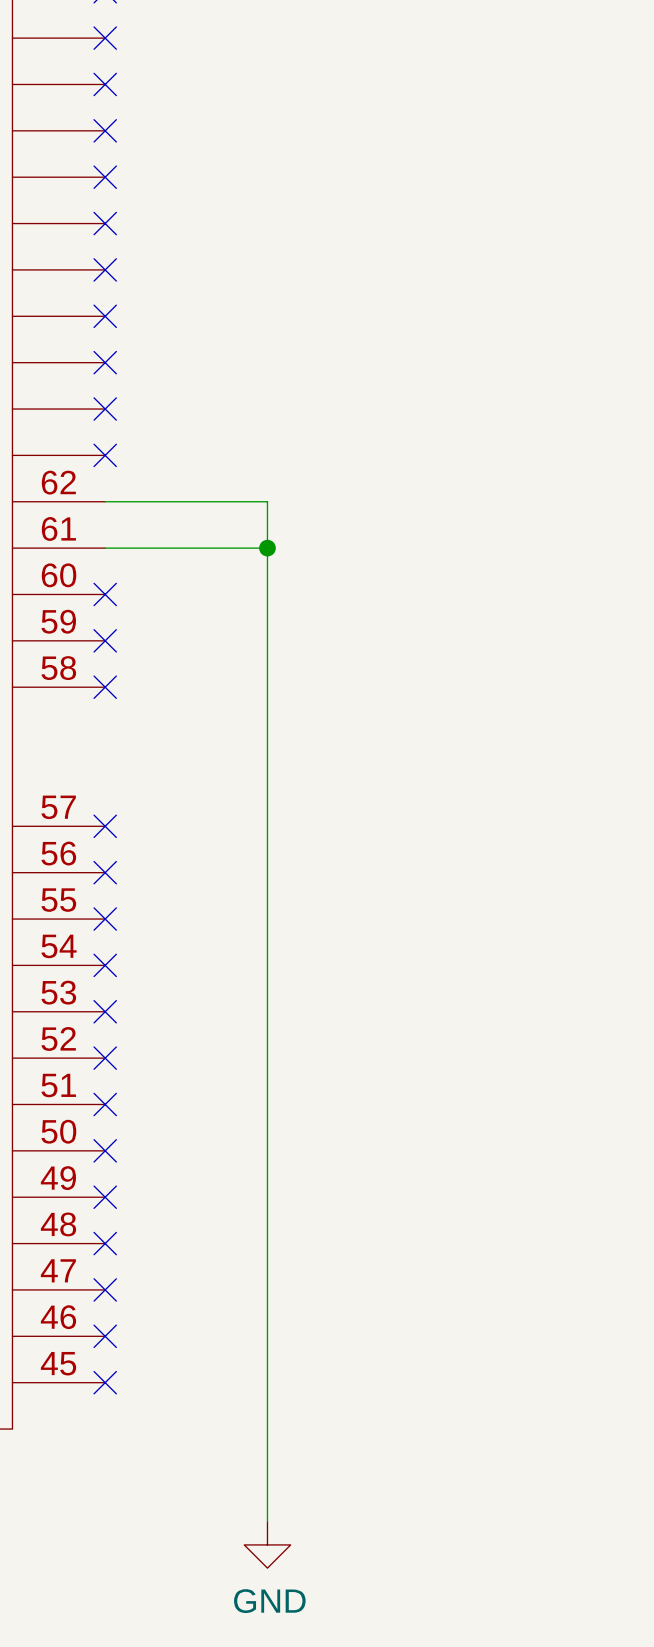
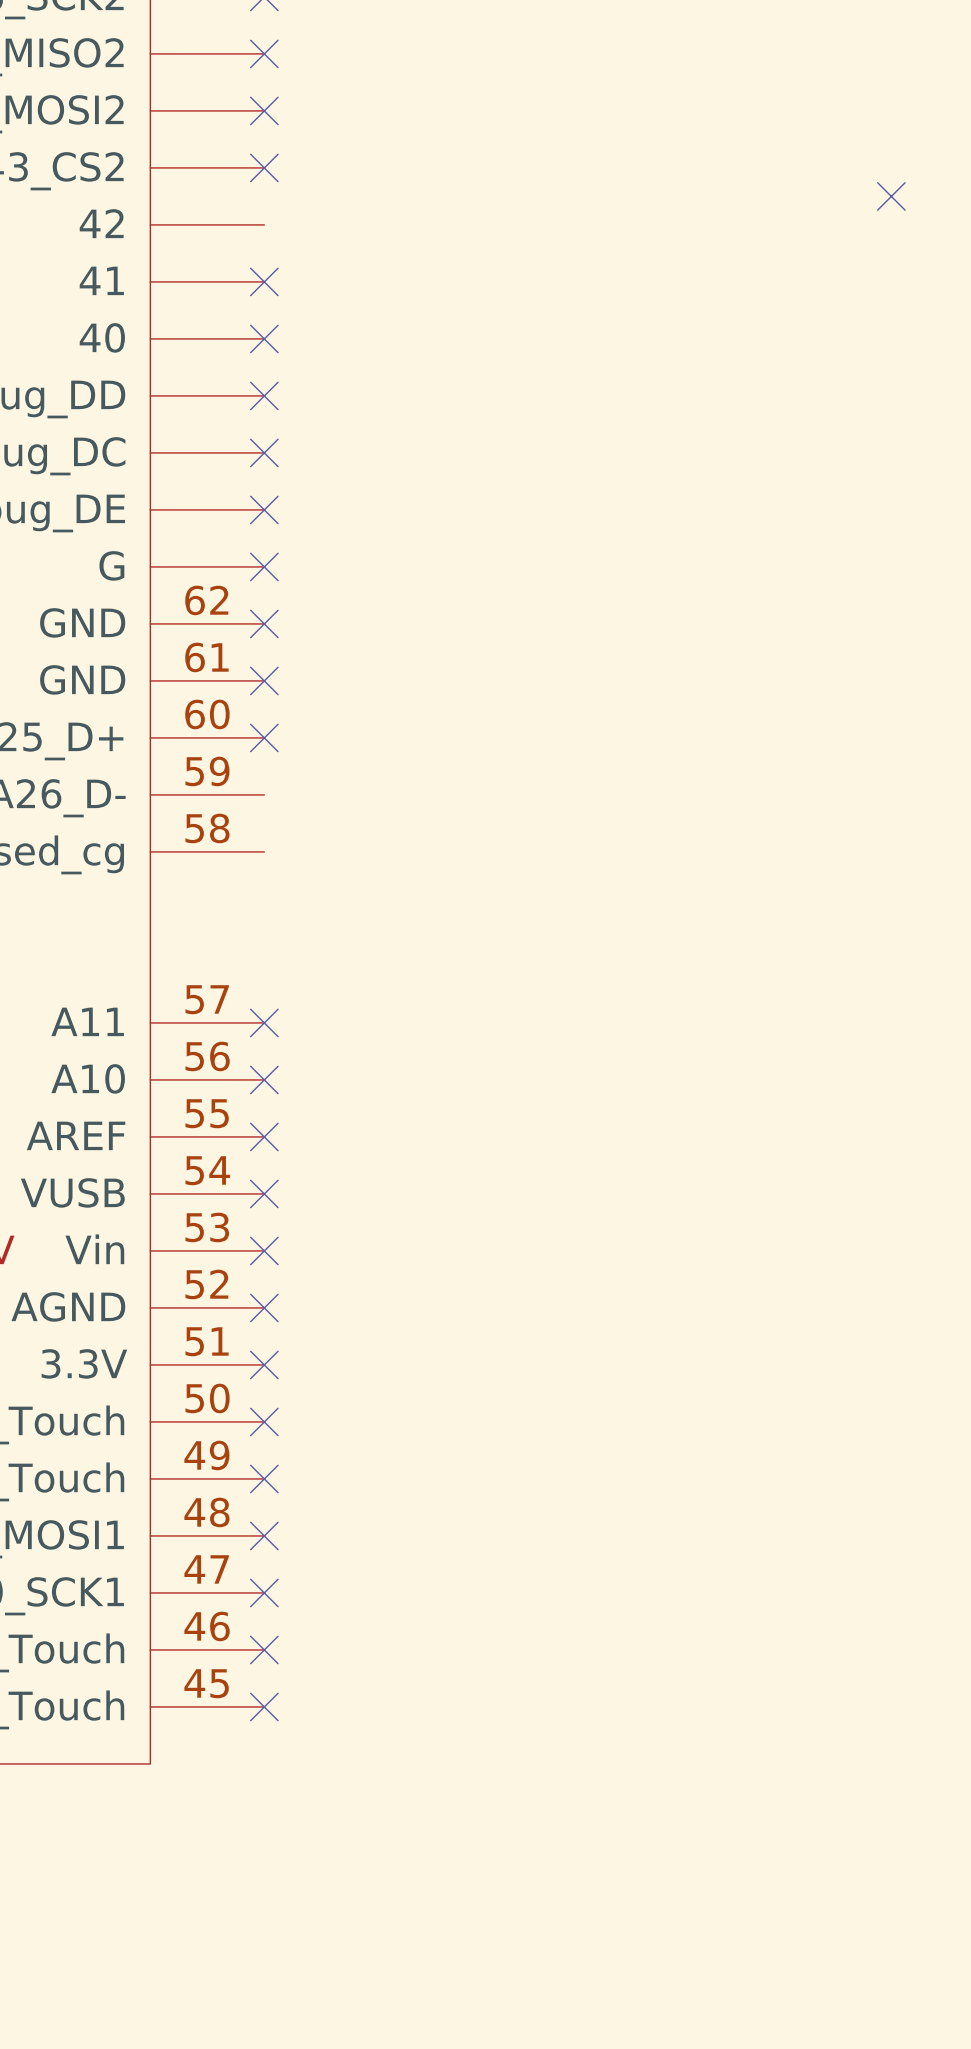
no-connect mark: none -> (891, 196)
no-connect mark: (105, 177) -> none
wire: (105, 501) (267, 501) (267, 1521) -> none
no-connect mark: none -> (264, 623)
wire: (105, 548) (267, 548) -> none
no-connect mark: none -> (264, 680)
junction: (267, 548) -> none
no-connect mark: (105, 640) -> none
no-connect mark: (105, 687) -> none
power symbol: GND (267, 1544) -> none

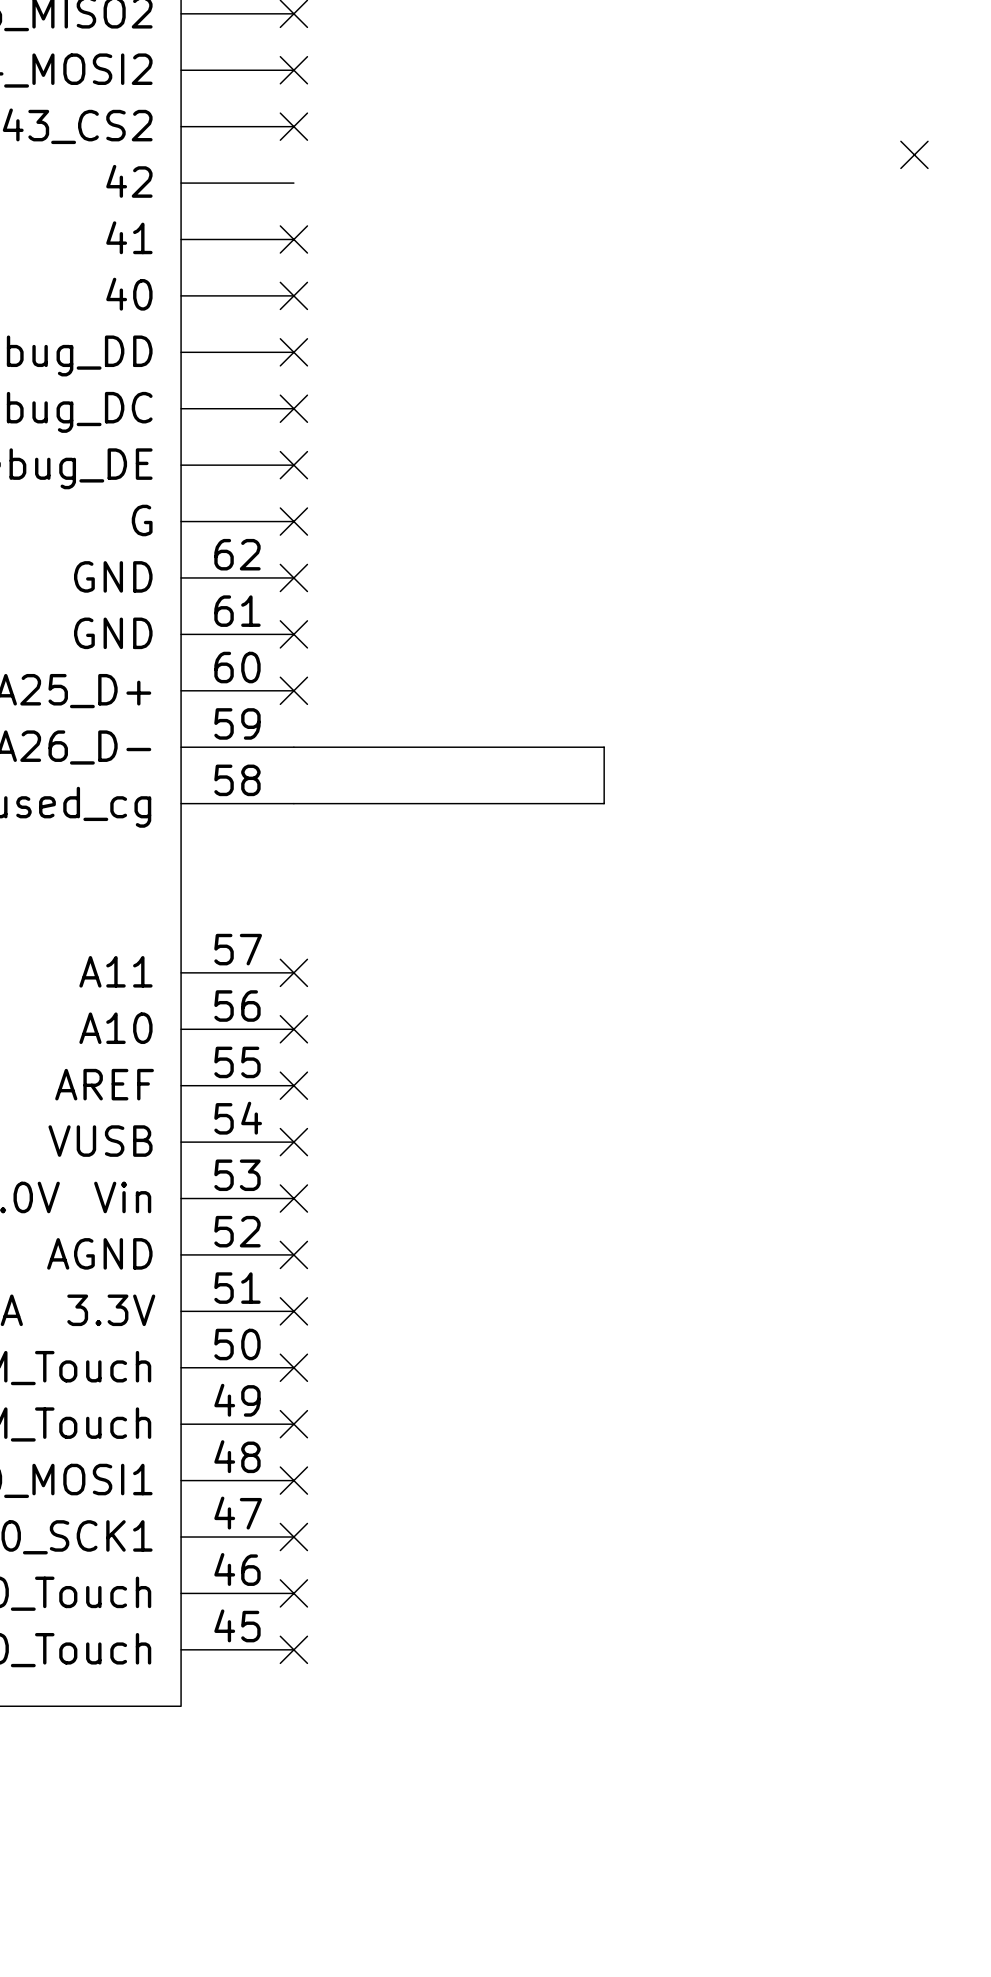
wire: none -> (293, 747) (604, 747) (604, 803) (293, 803)

